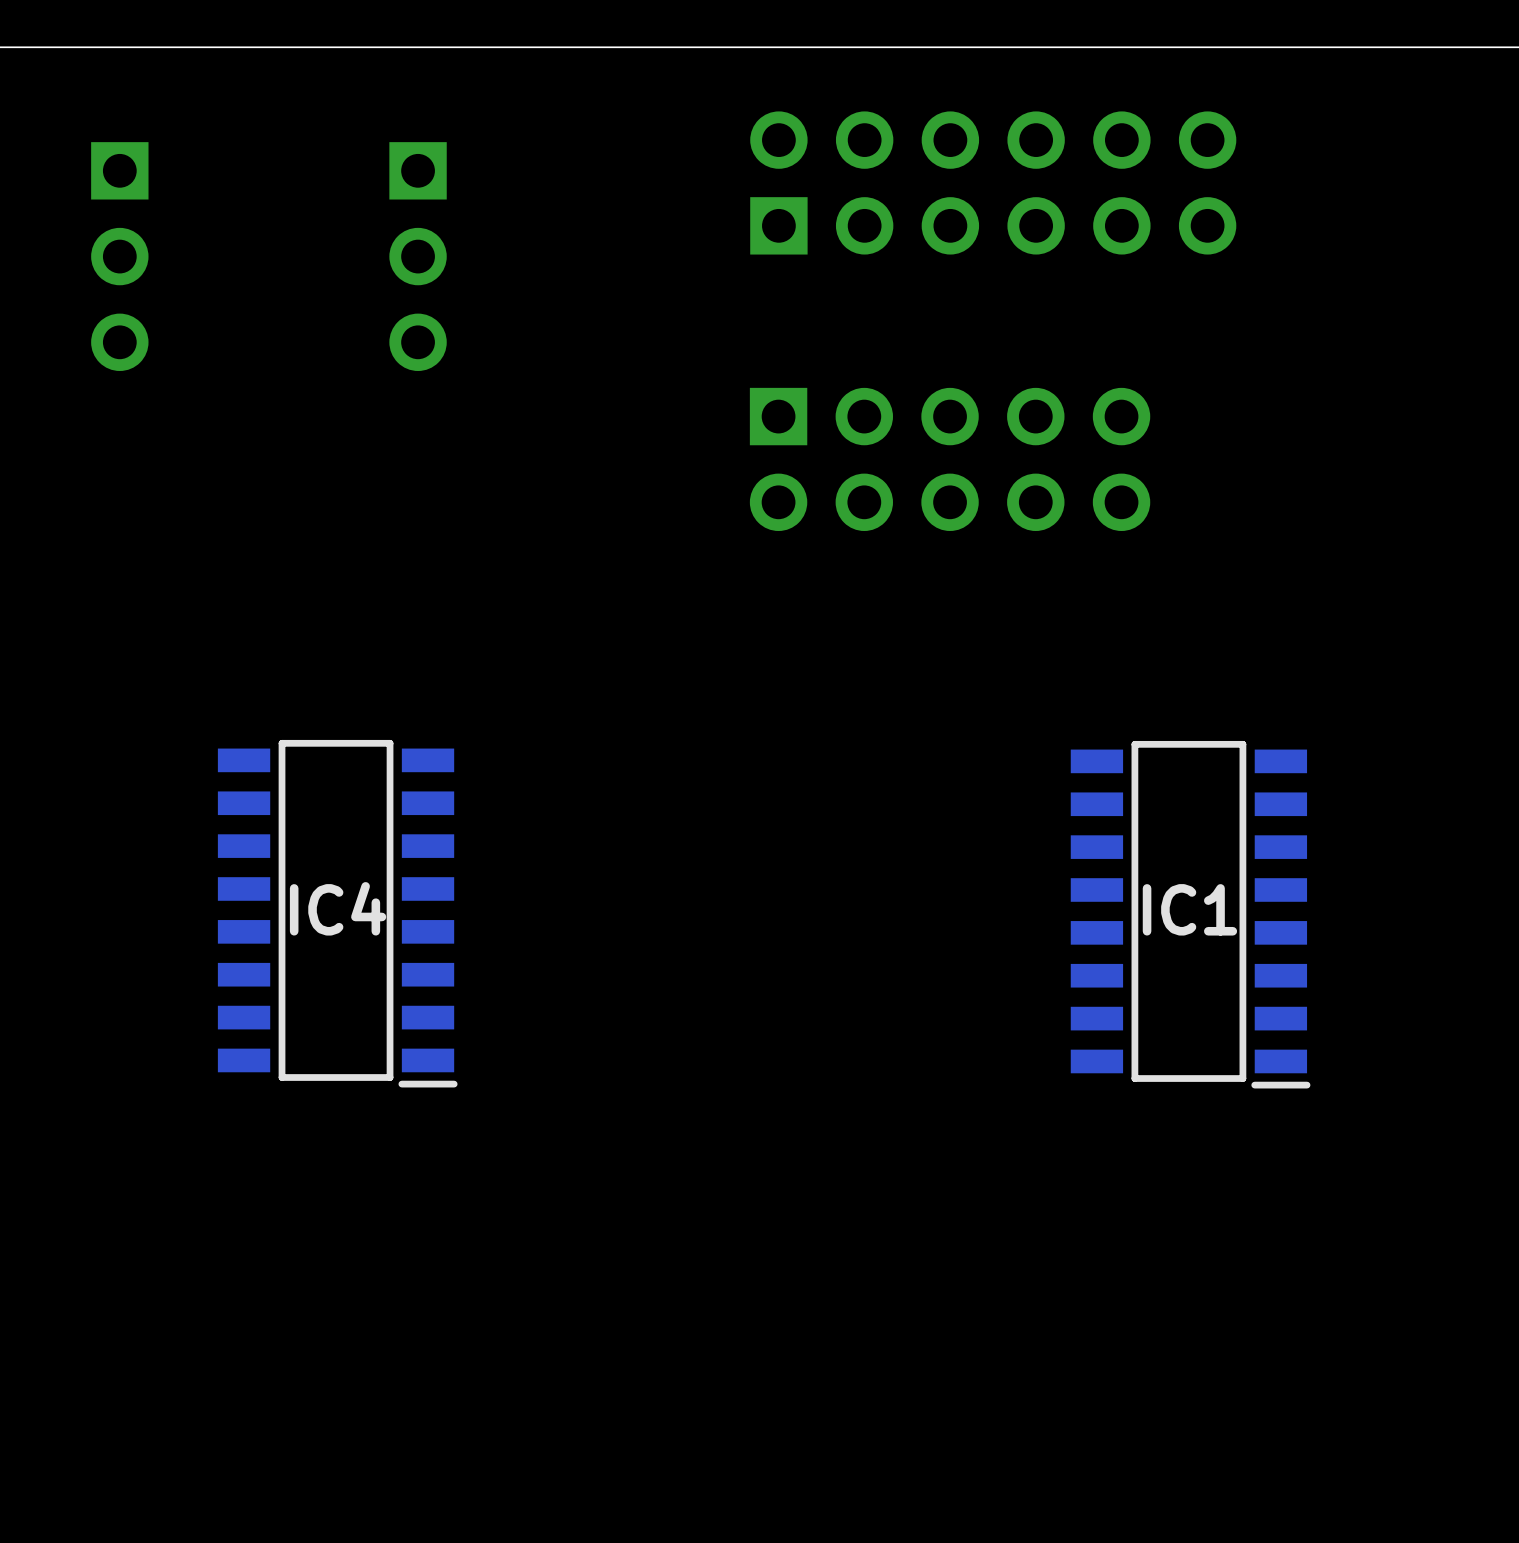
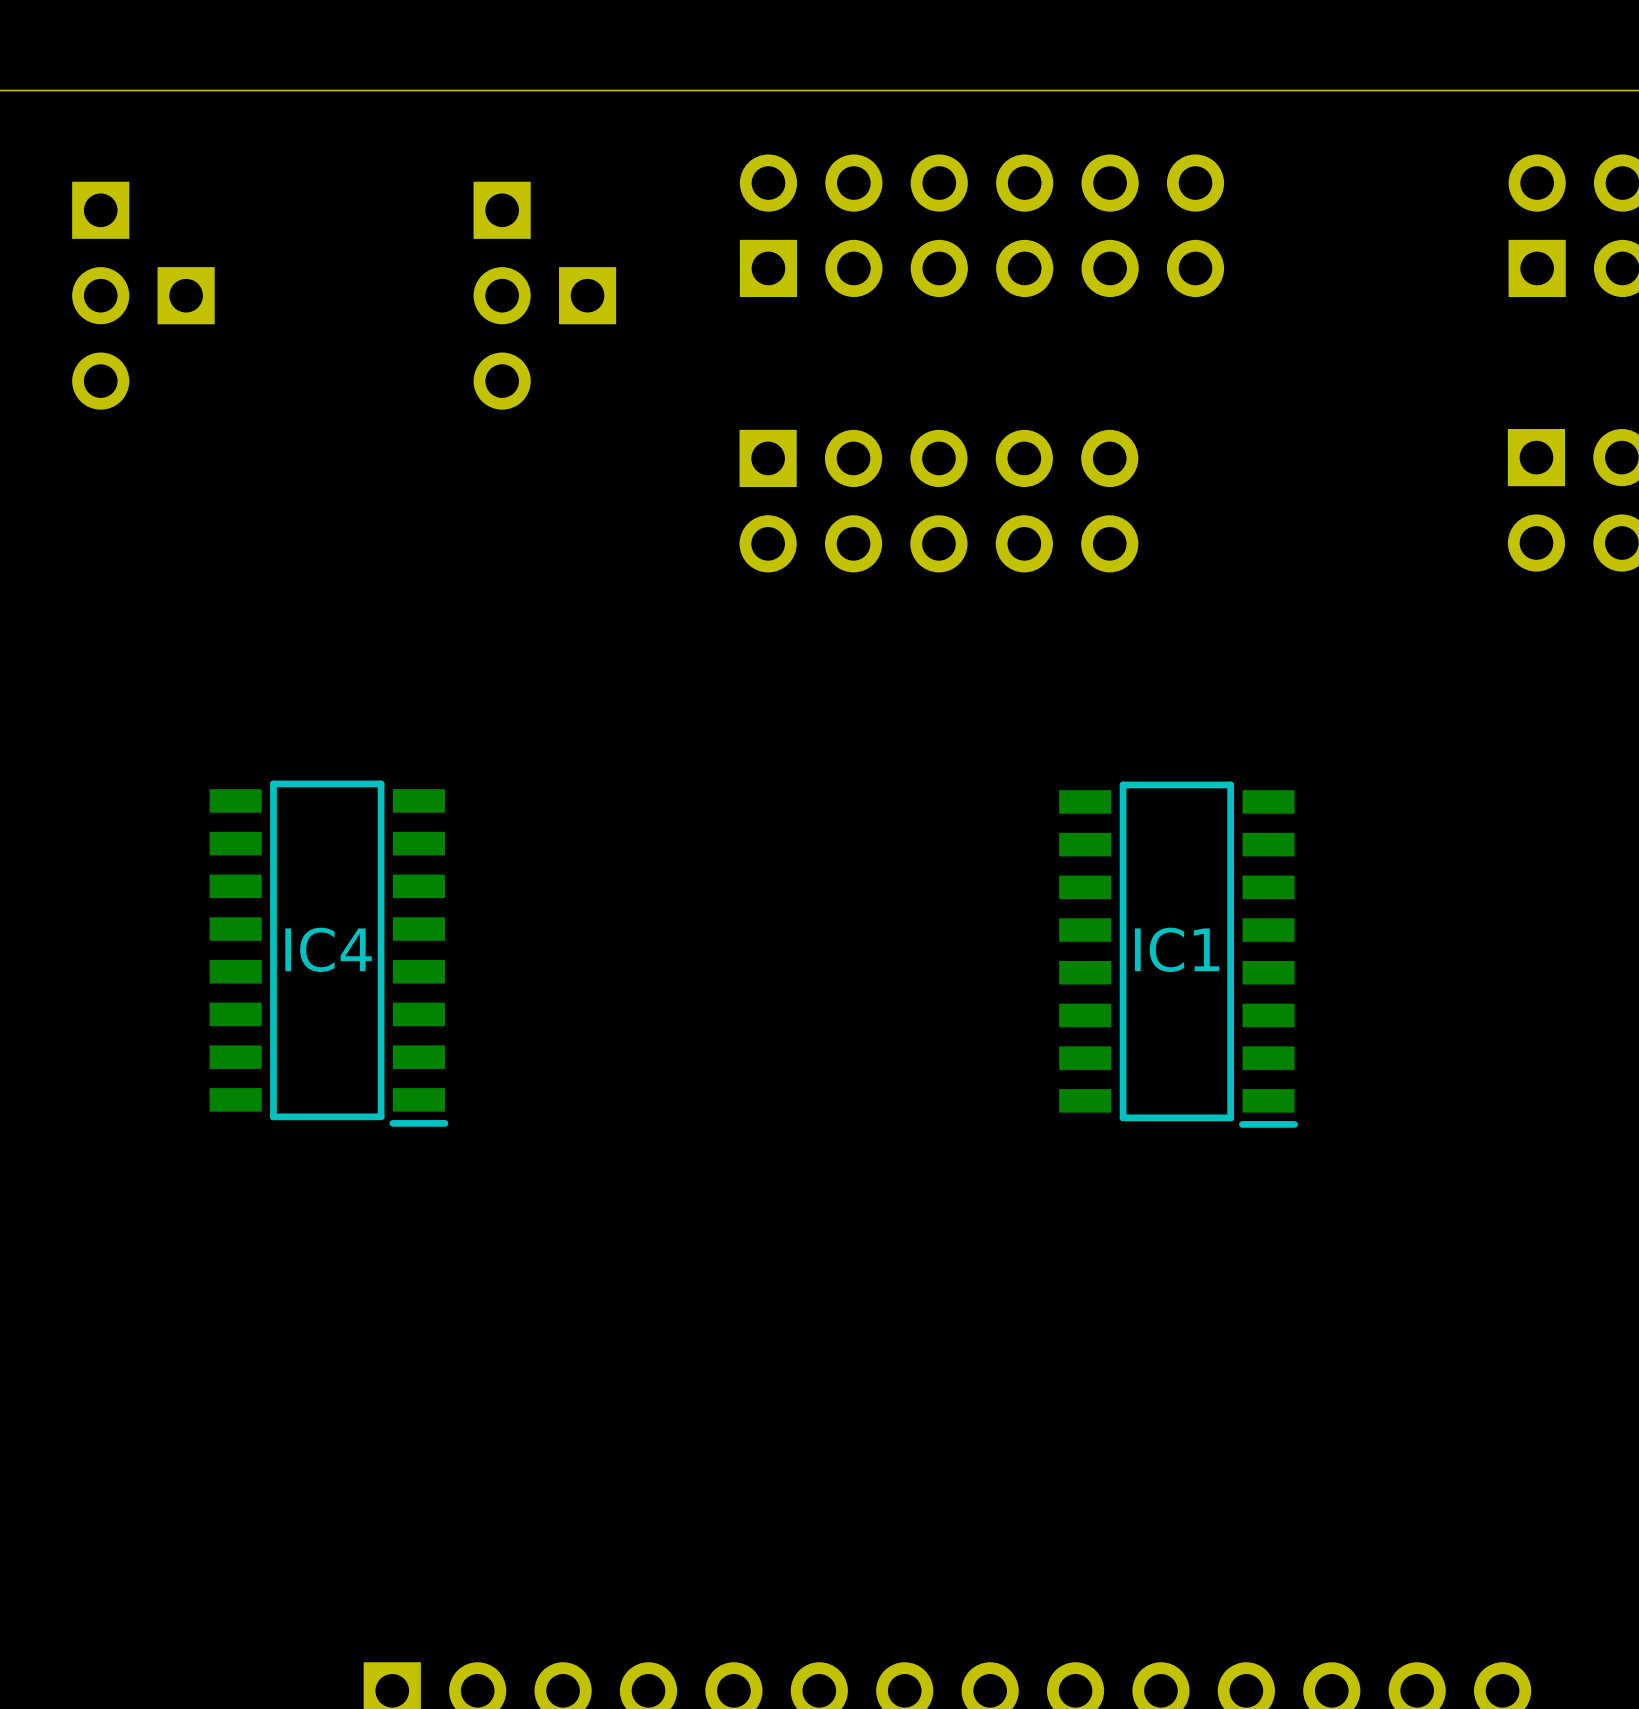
part footprint: [91, 142, 149, 371] -> [72, 181, 215, 410]
part: none -> (544, 295)
part: (418, 256) -> none

